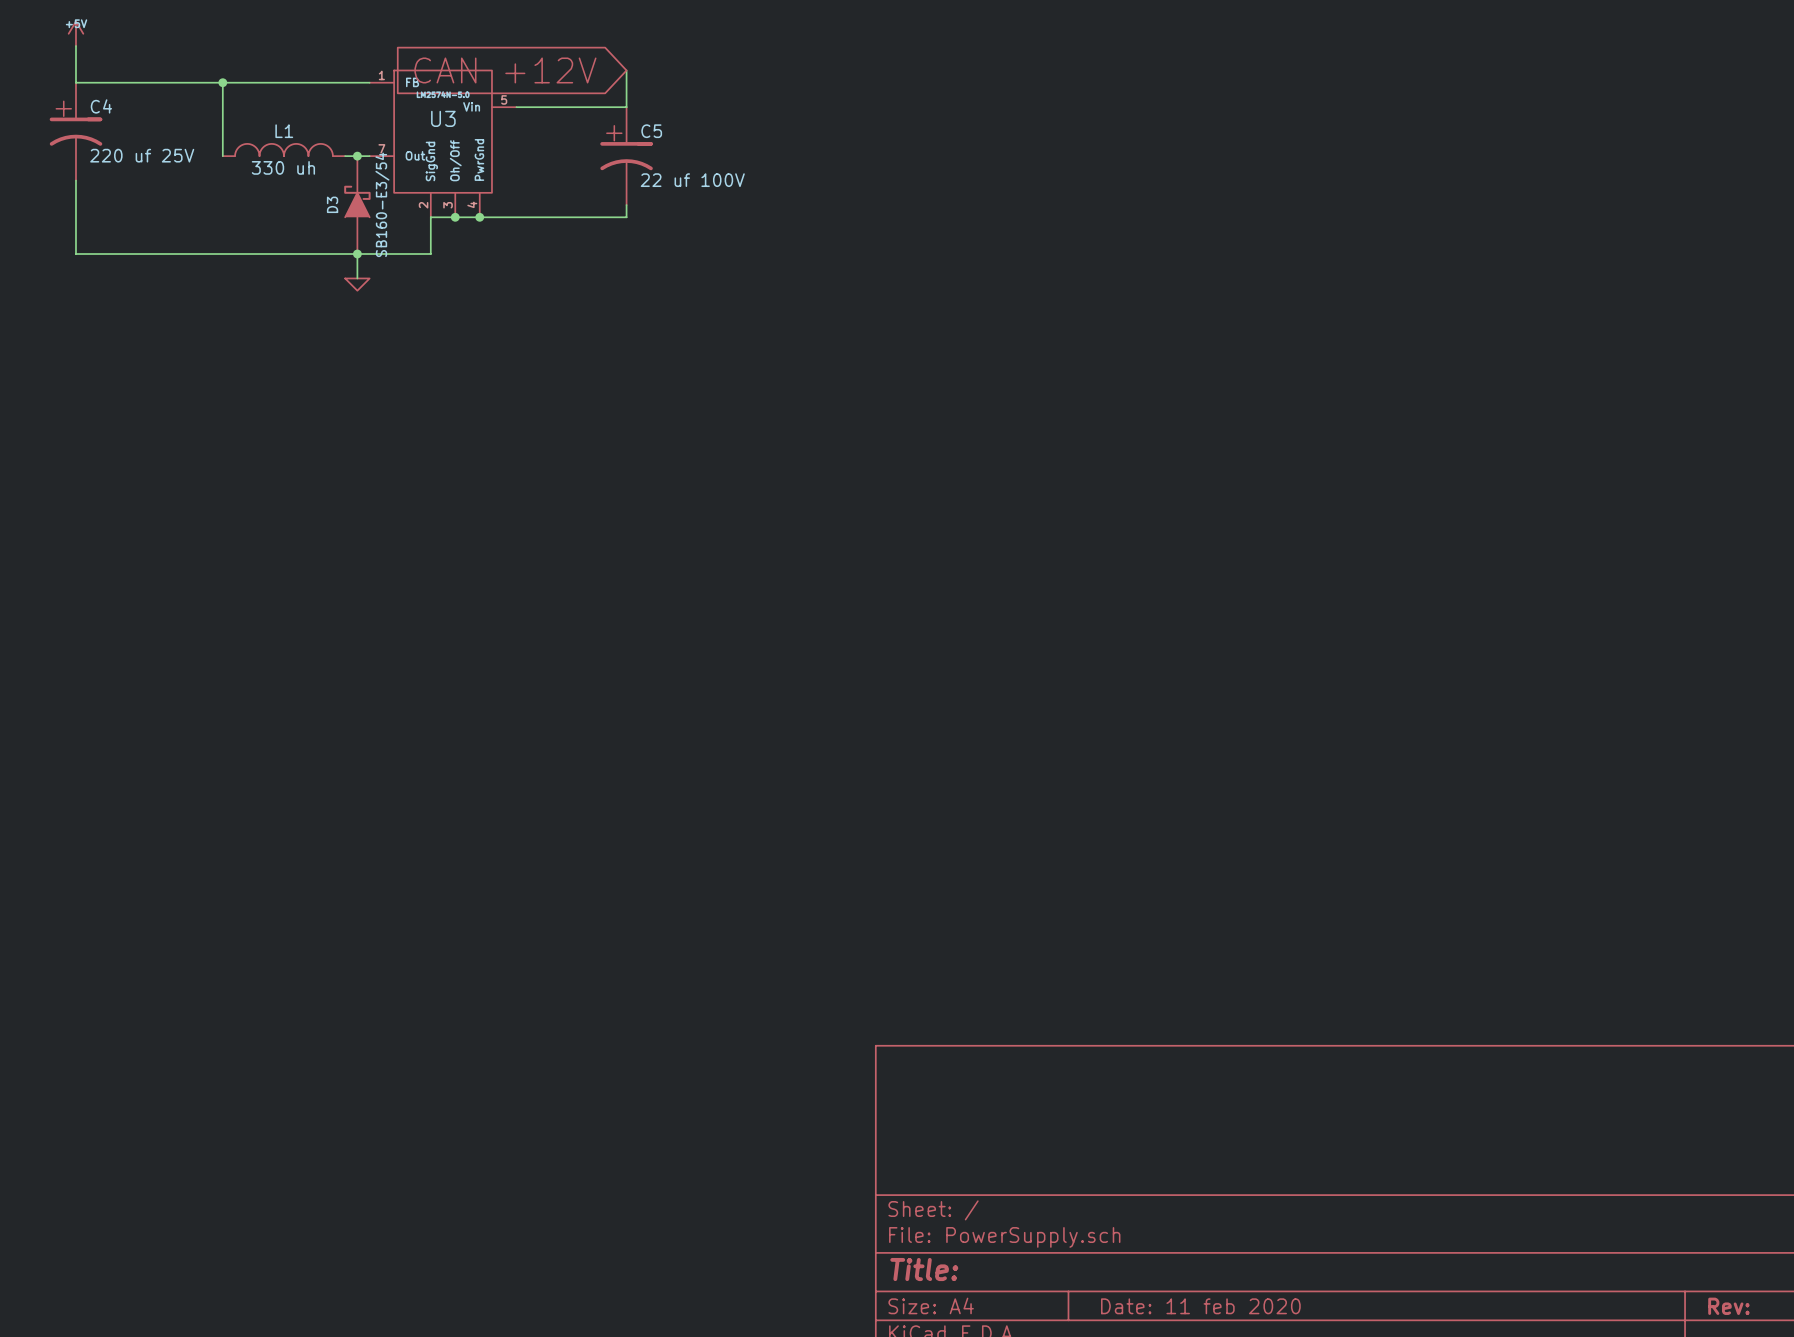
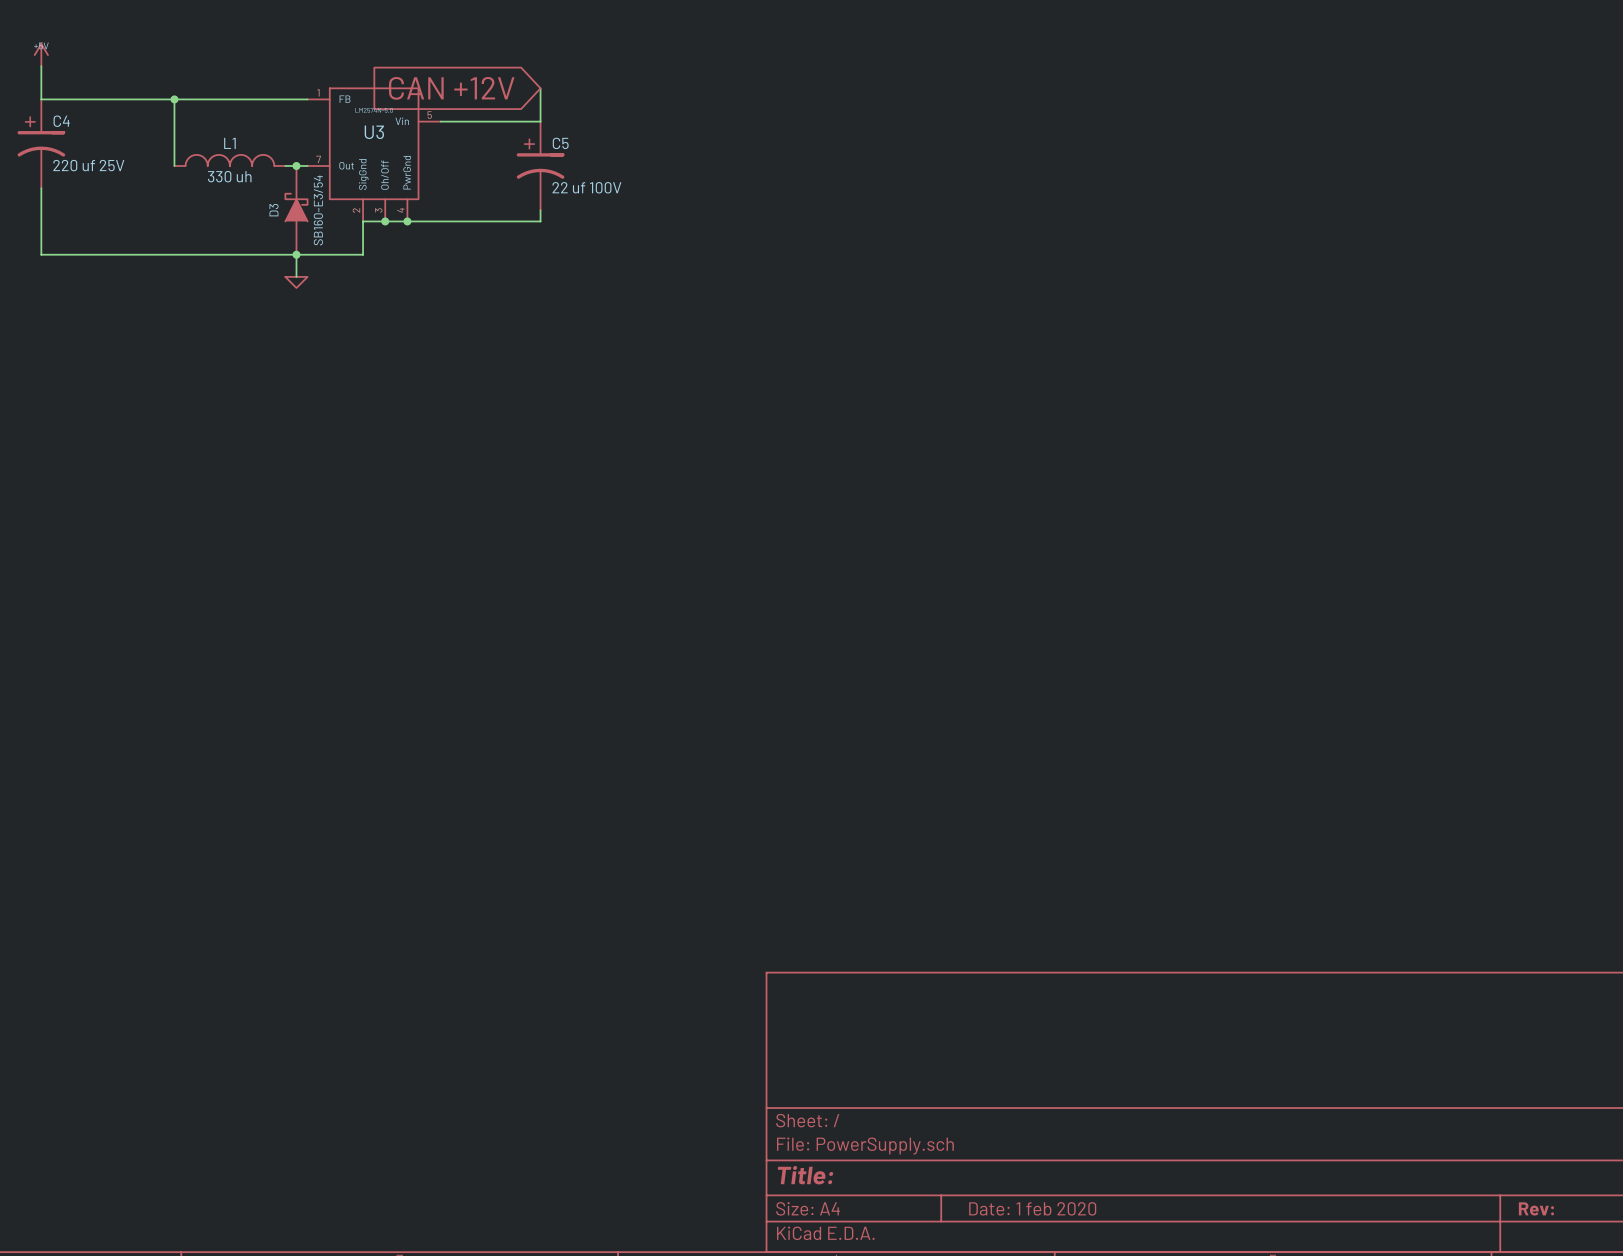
title block: Date: 11 feb 2020 (1200, 1306) -> Date: 1 feb 2020 (1032, 1208)

